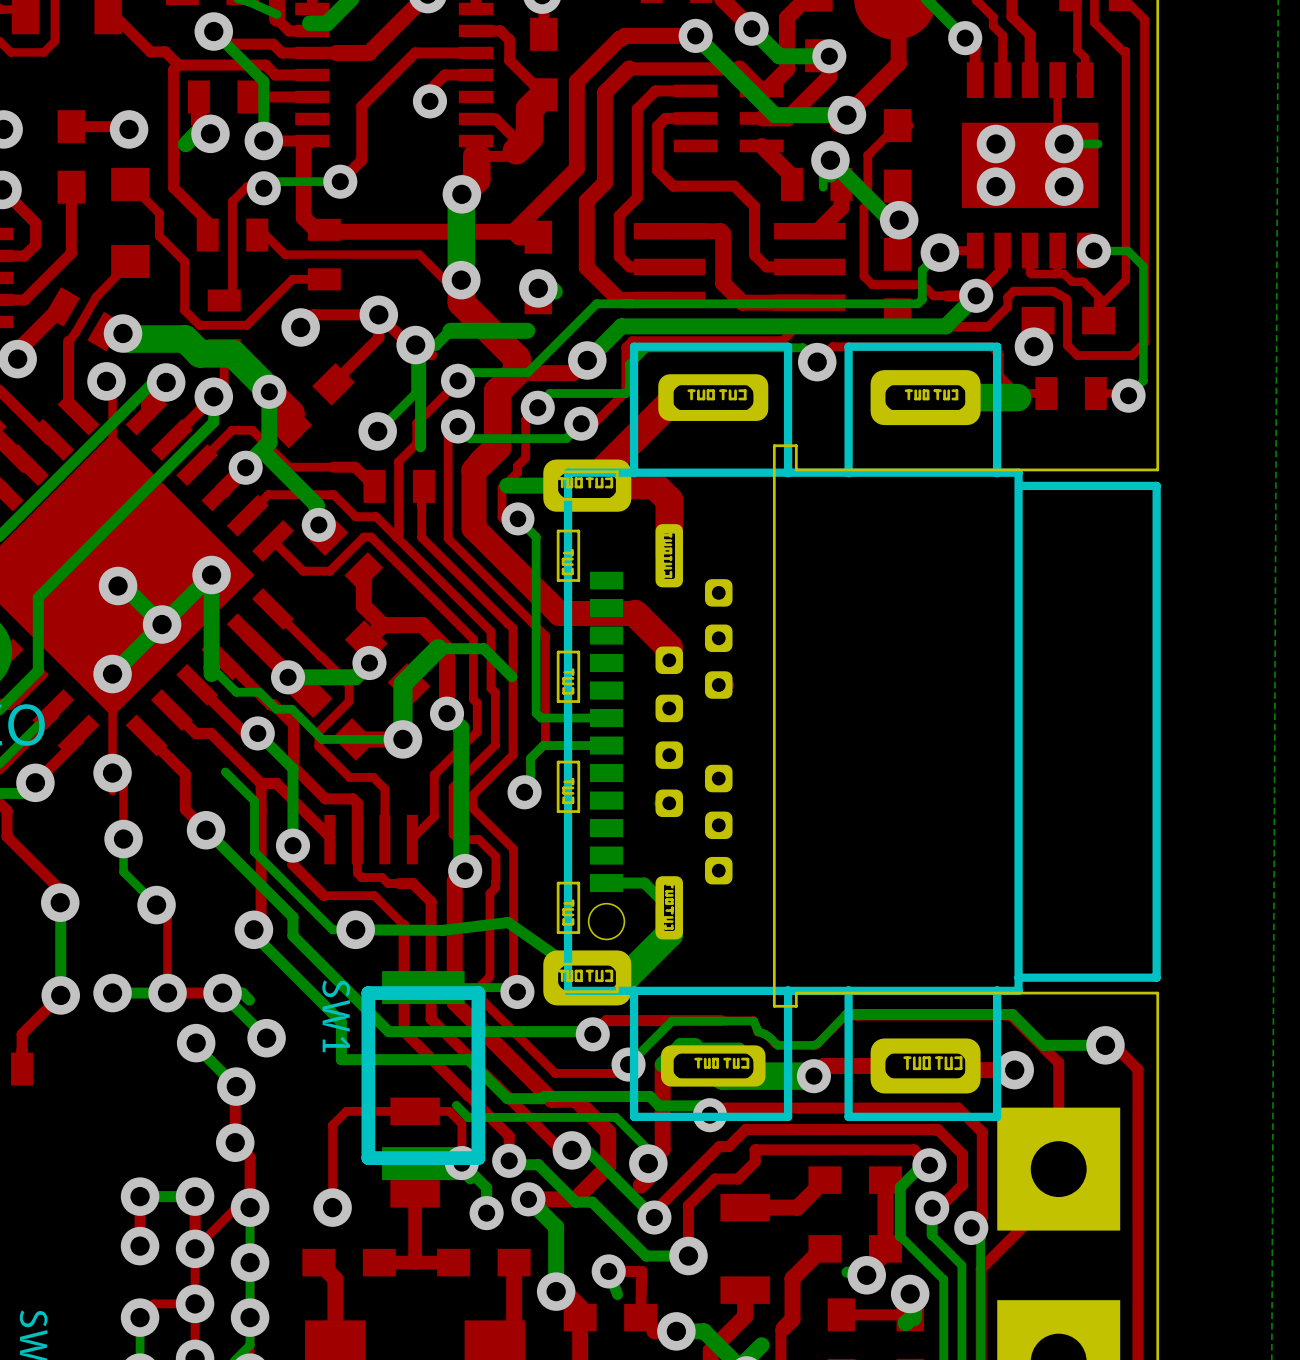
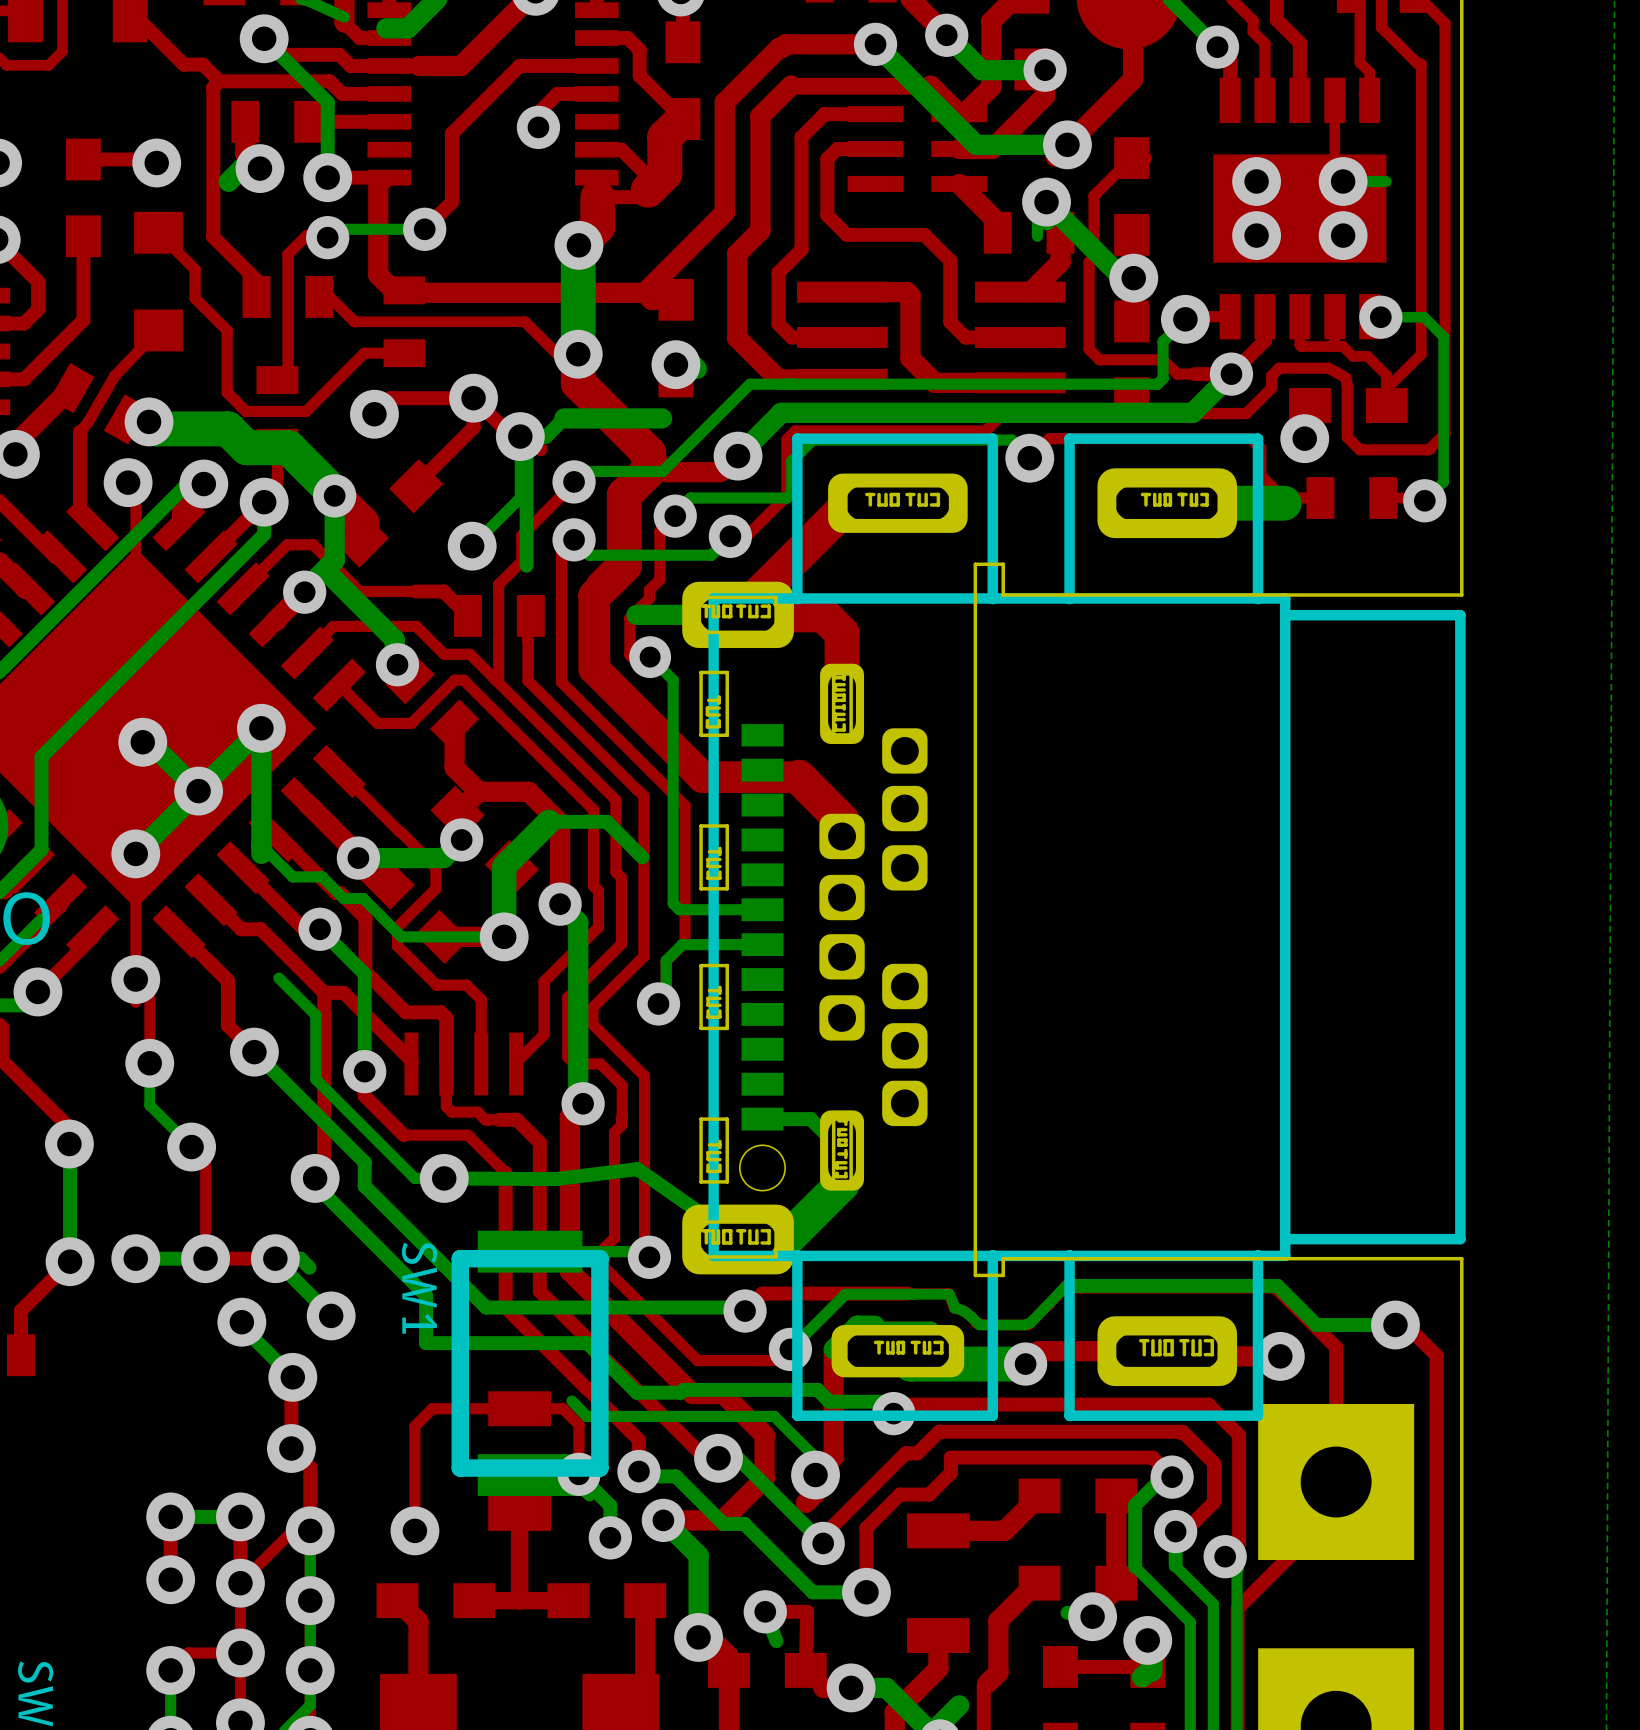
part footprint: [543, 342, 1161, 1121] -> [682, 433, 1466, 1421]

